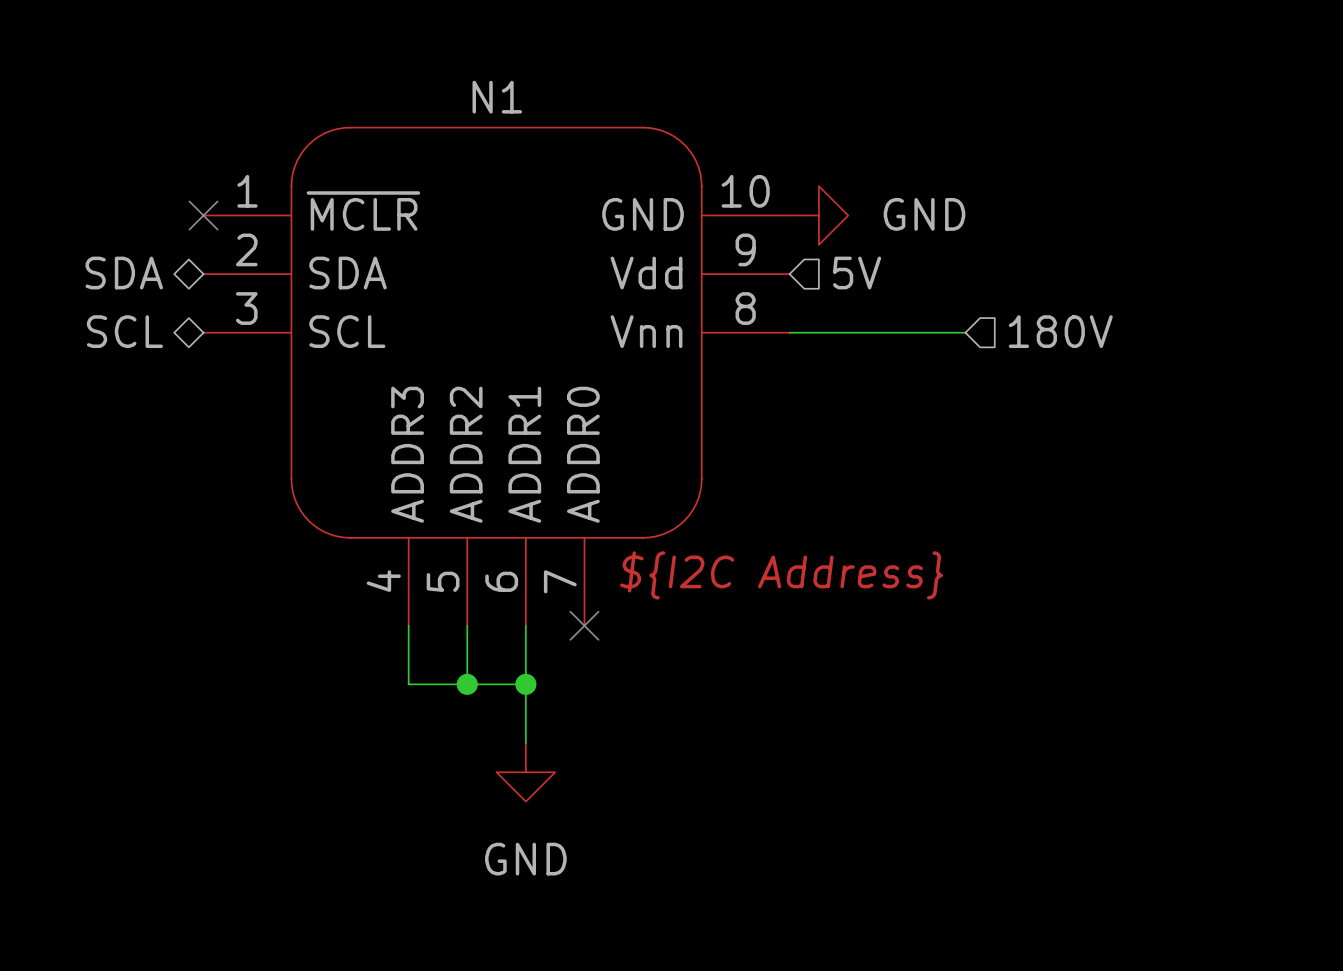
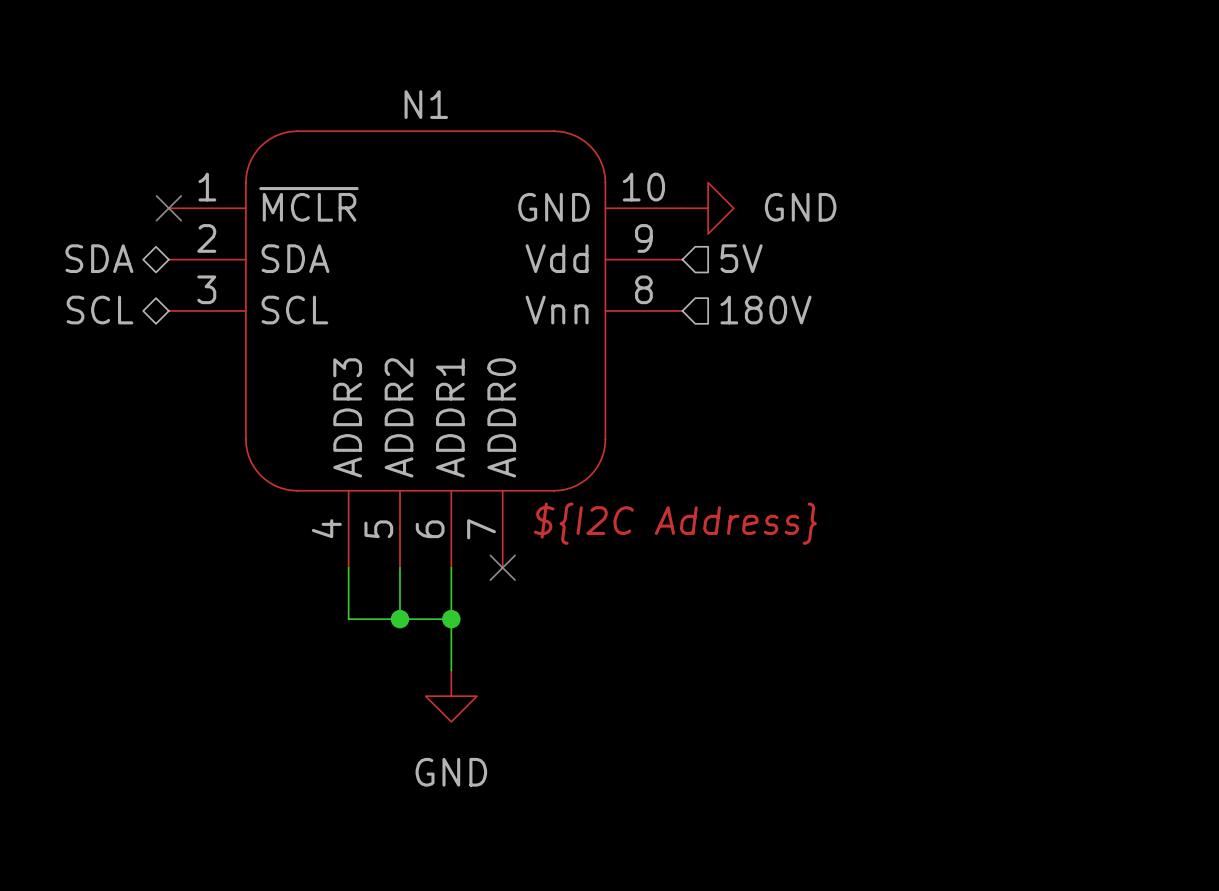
hierarchical label position: 180V (1060, 331) -> 180V (766, 310)
wire: (789, 332) (965, 332) -> none

